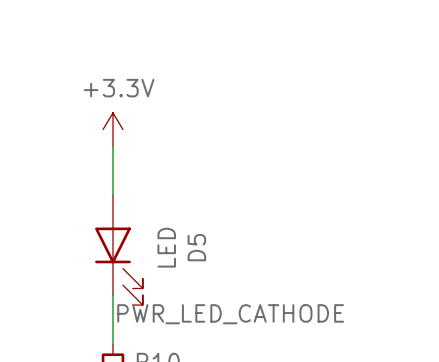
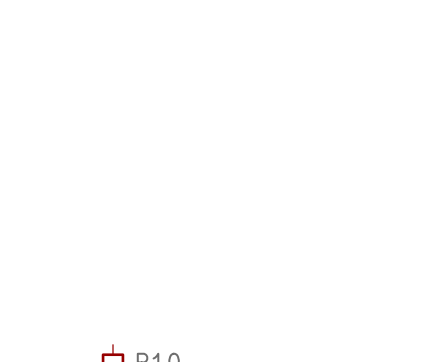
power symbol: +3.3V (112, 129) -> none
wire: (112, 146) (112, 195) -> none
D5: LED (118, 250) -> none
wire: (112, 295) (112, 344) -> none
label: PWR_LED_CATHODE (230, 314) -> none

